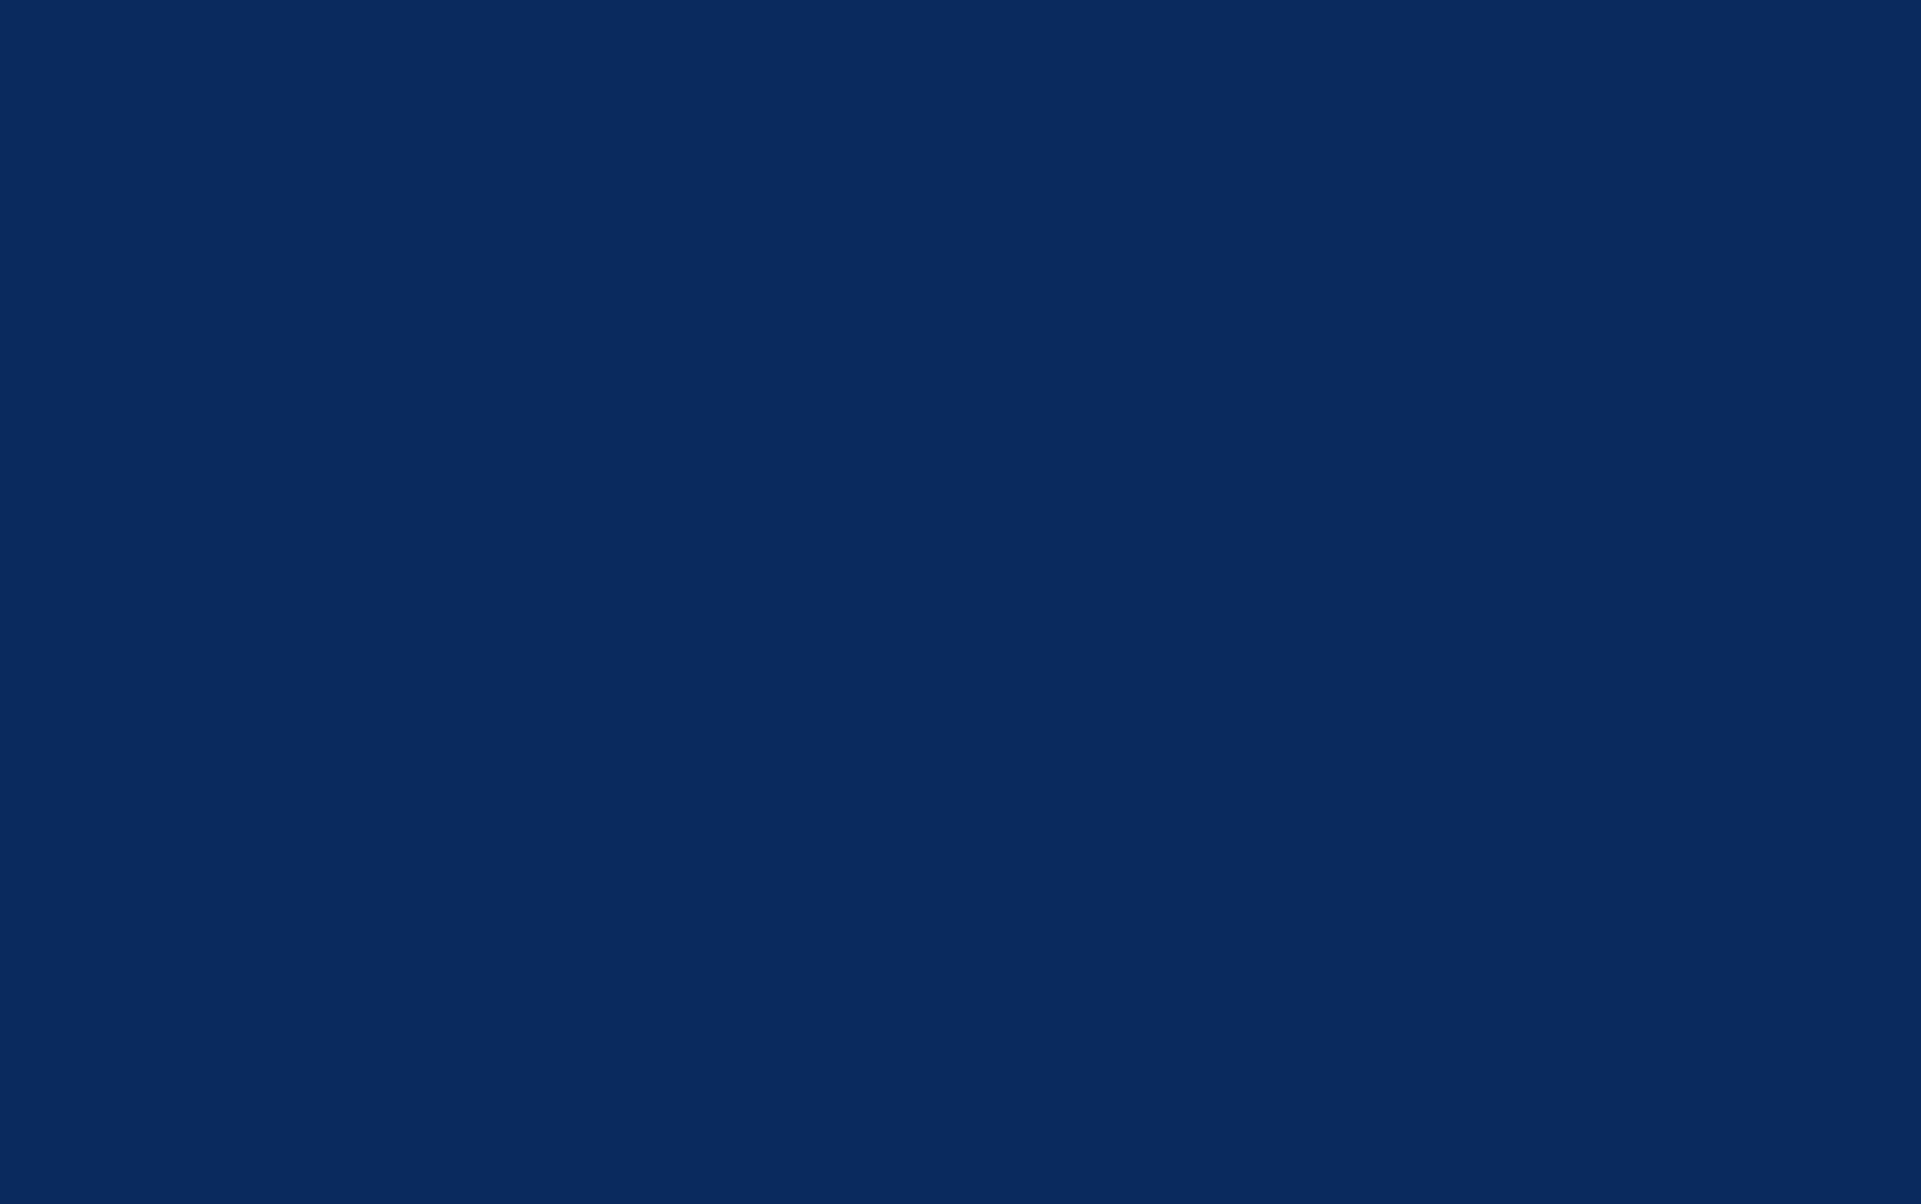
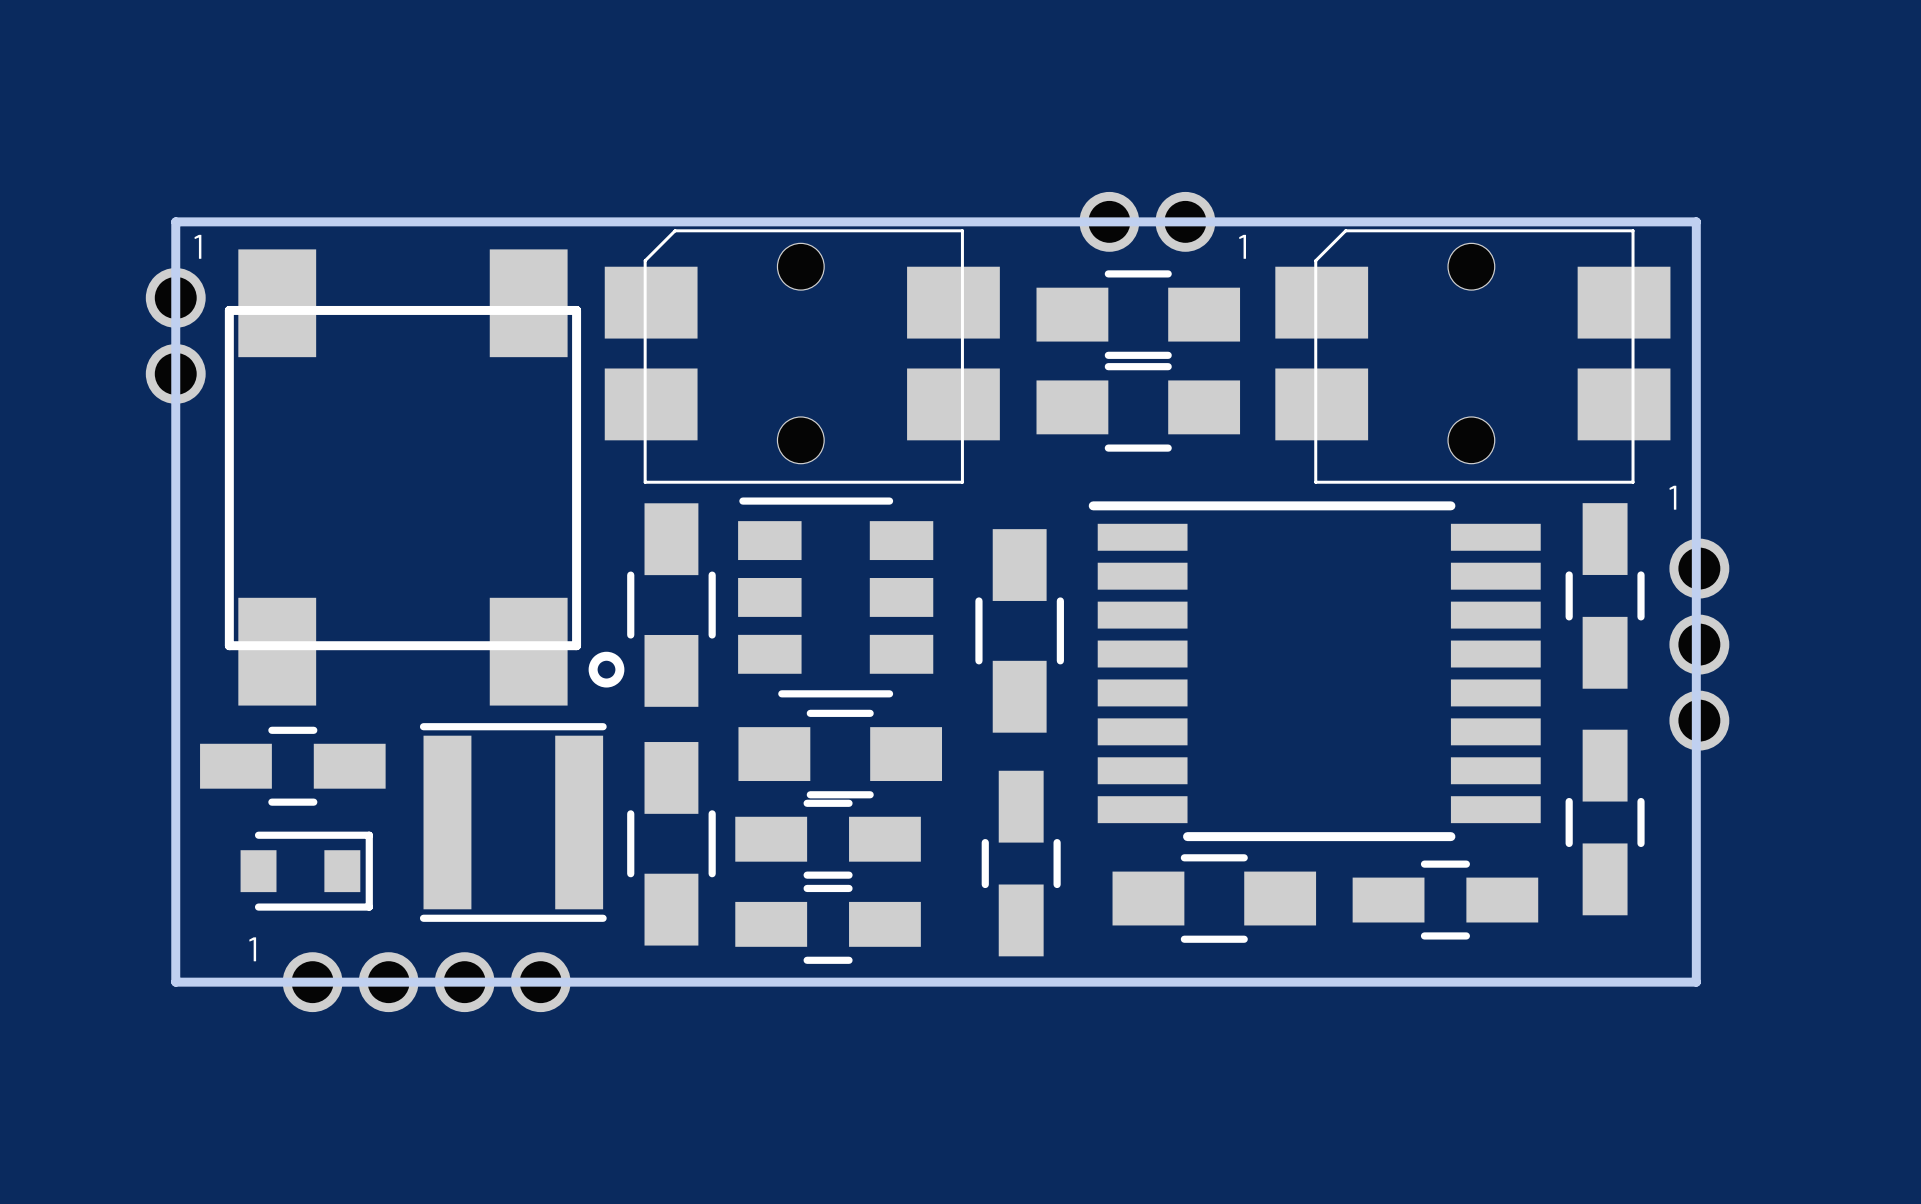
board edge: none -> (175, 221) (175, 982) (1696, 982) (1696, 221) (175, 221)
part: none -> (1147, 221)
text: none -> 1 (197, 246)
text: none -> 1 (1242, 246)
part: none -> (1138, 314)
part: none -> (175, 335)
part: none -> (802, 356)
part: none -> (1472, 356)
part: none -> (1138, 407)
part: none -> (424, 477)
text: none -> 1 (1672, 497)
part: none -> (1605, 595)
part: none -> (835, 597)
part: none -> (671, 605)
part: none -> (1019, 630)
part: none -> (1699, 644)
part: none -> (1314, 671)
part: none -> (840, 754)
part: none -> (292, 766)
part: none -> (513, 822)
part: none -> (1605, 822)
part: none -> (828, 839)
part: none -> (671, 843)
part: none -> (1021, 863)
part: none -> (306, 871)
part: none -> (1214, 898)
part: none -> (1445, 900)
part: none -> (828, 924)
text: none -> 1 (252, 949)
part: none -> (426, 982)

